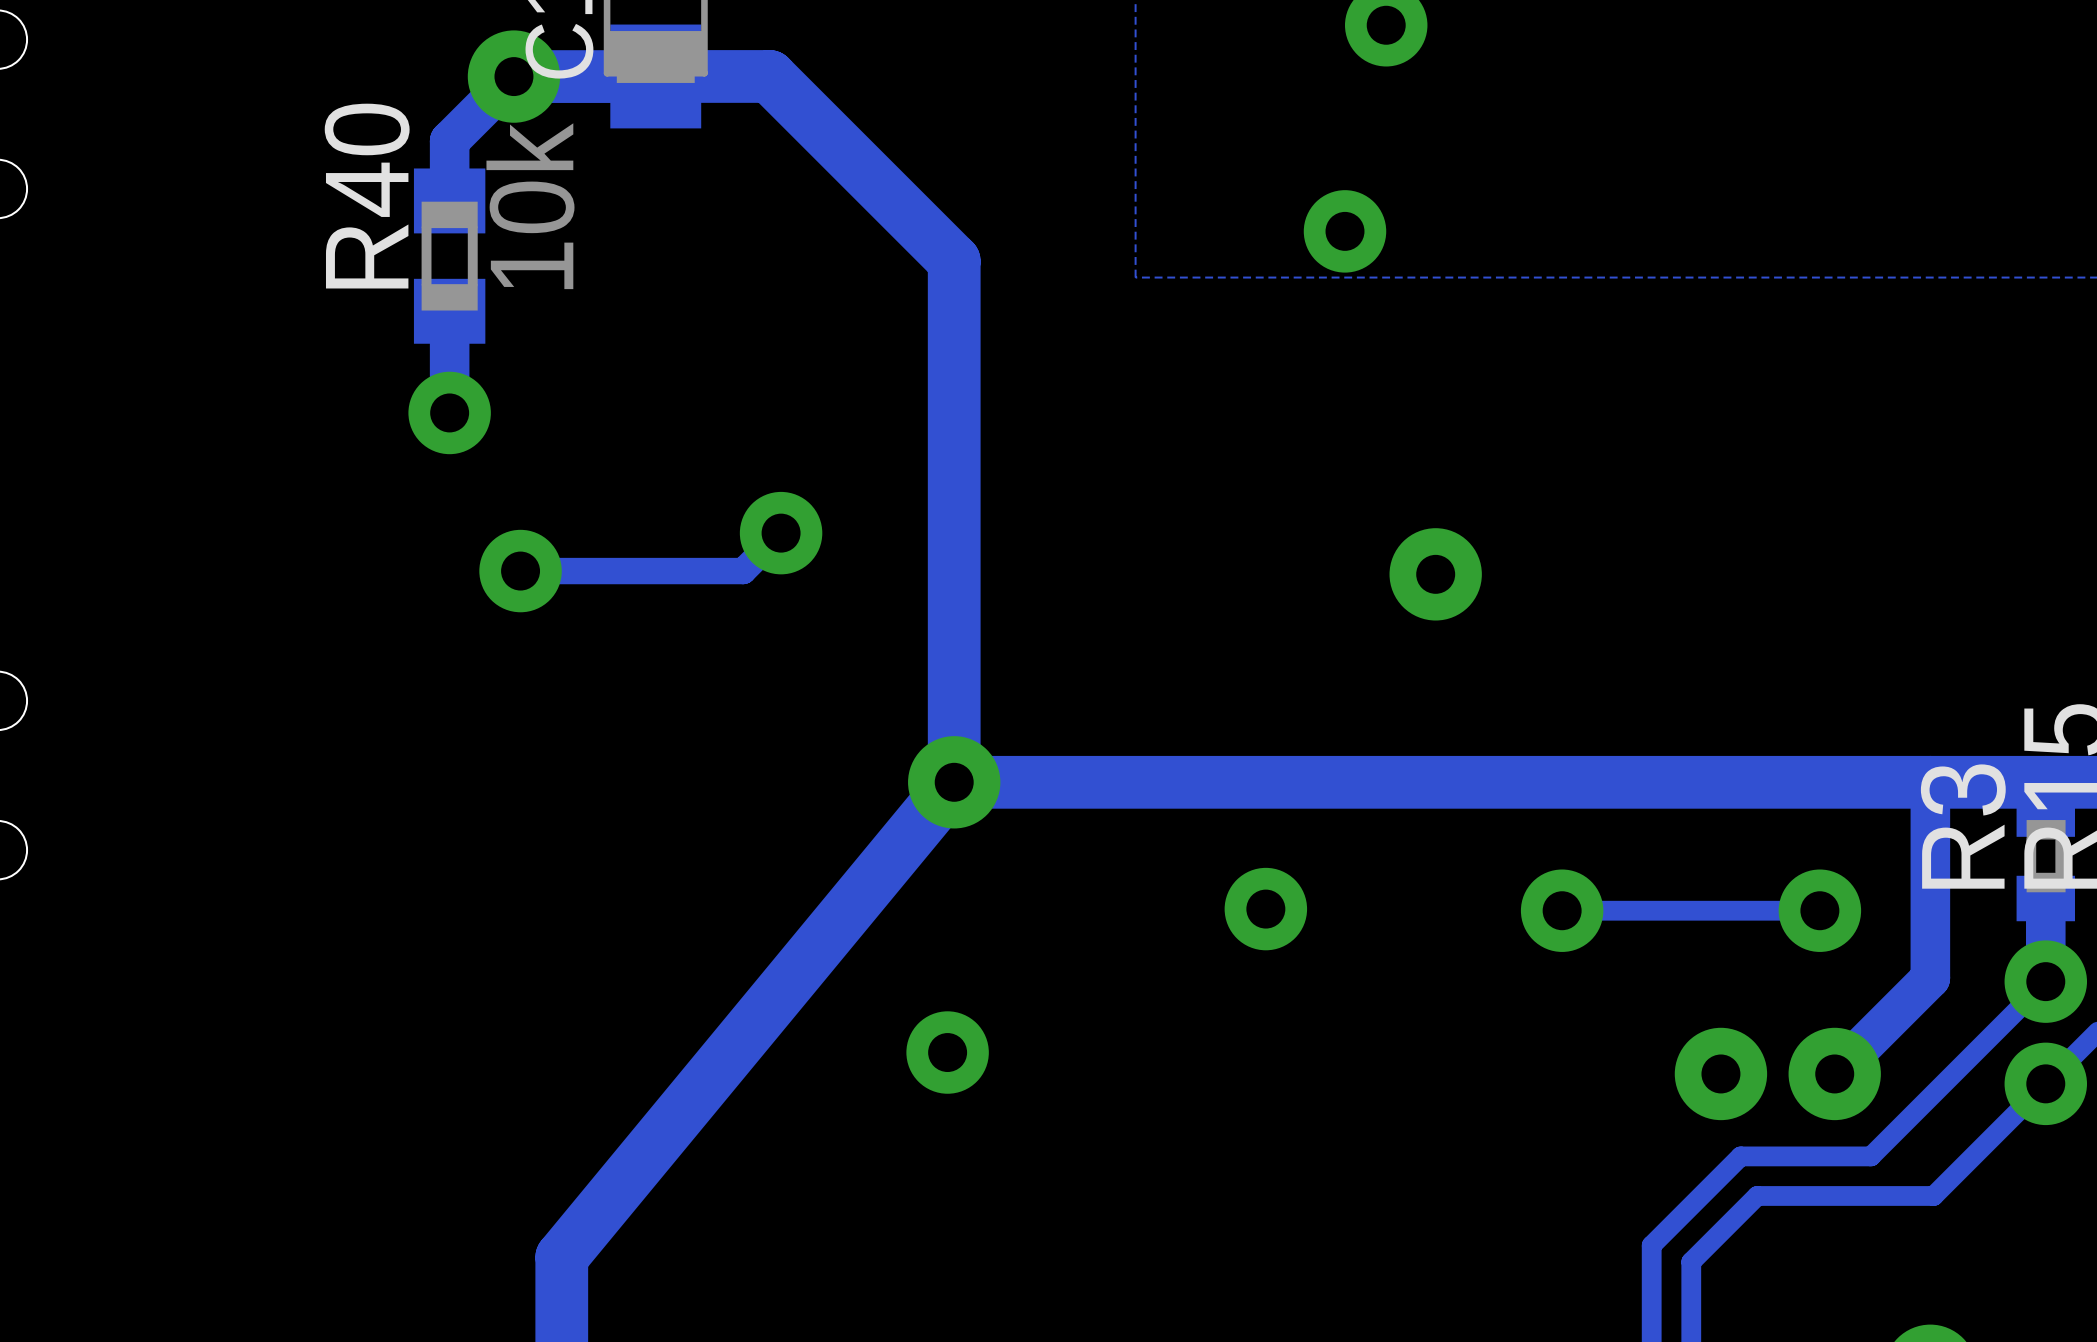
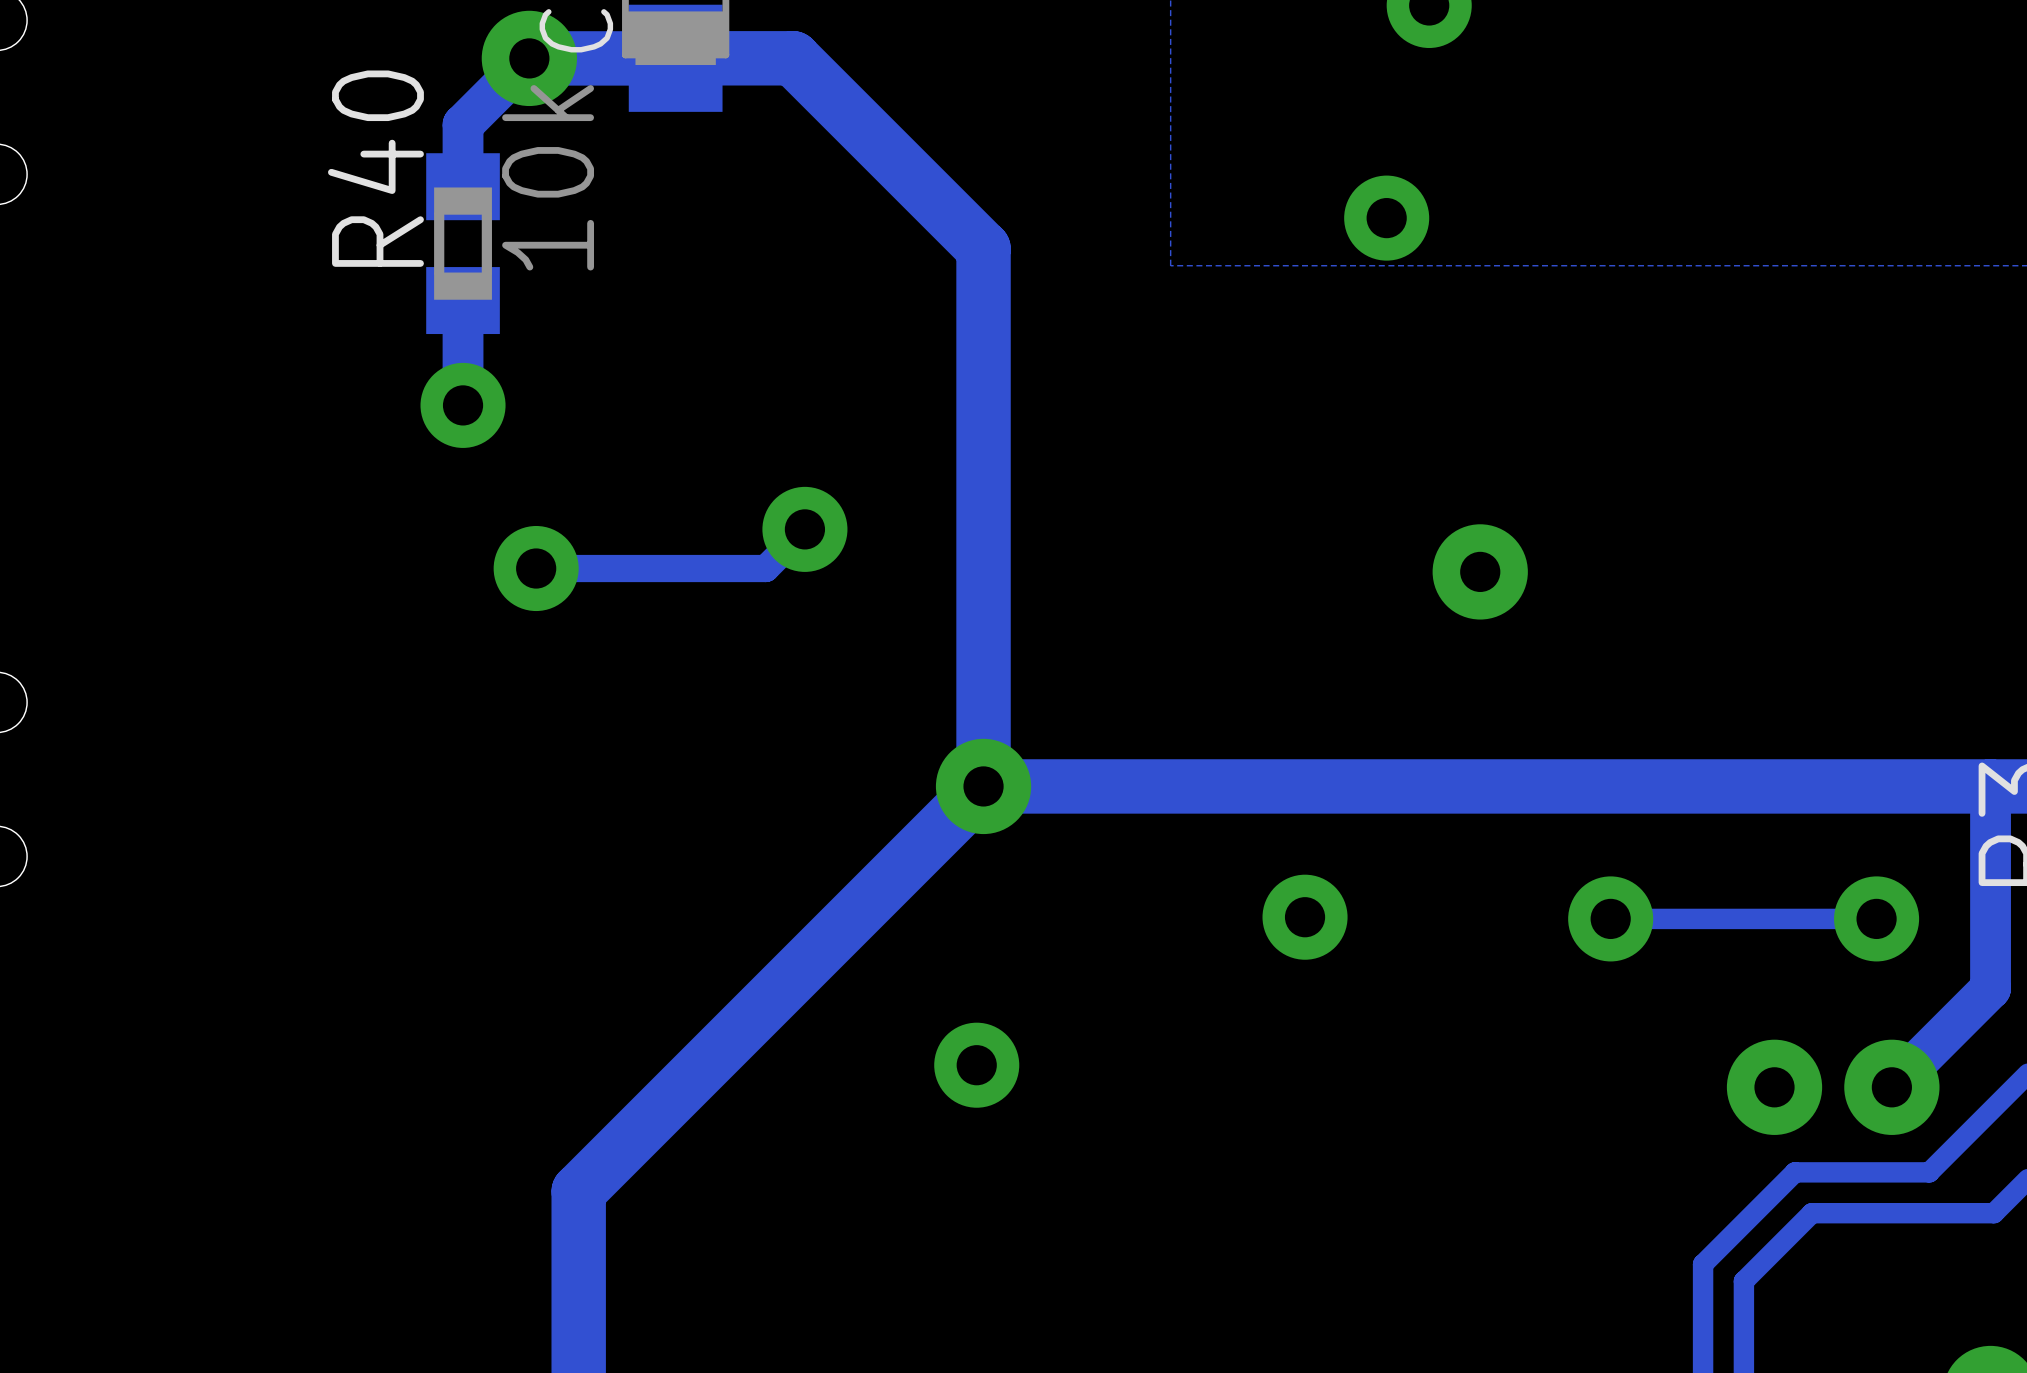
track: (954, 782) (561, 1257) -> (983, 786) (578, 1191) (578, 1276)

